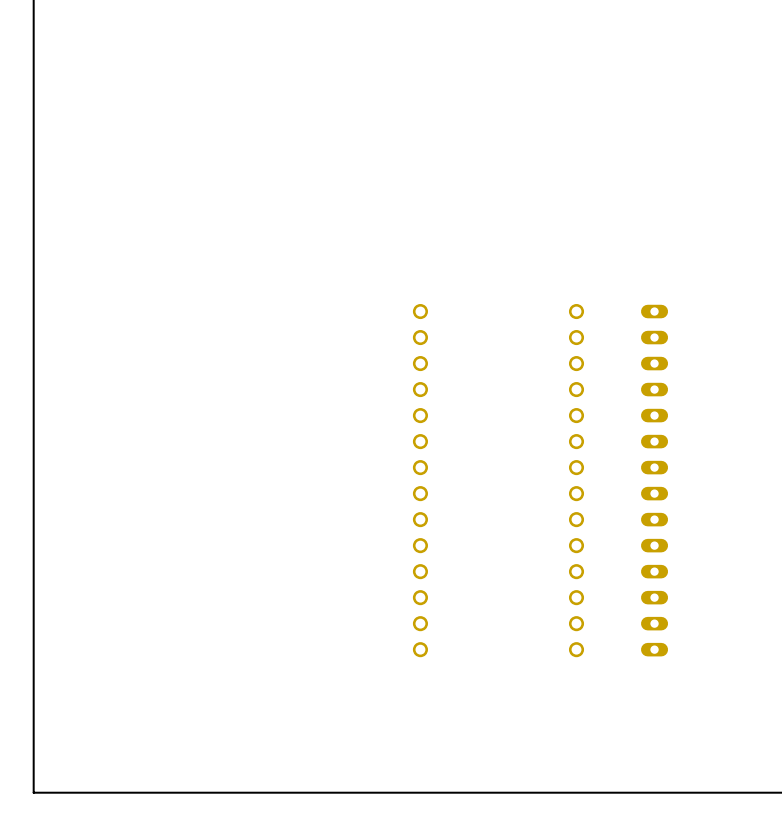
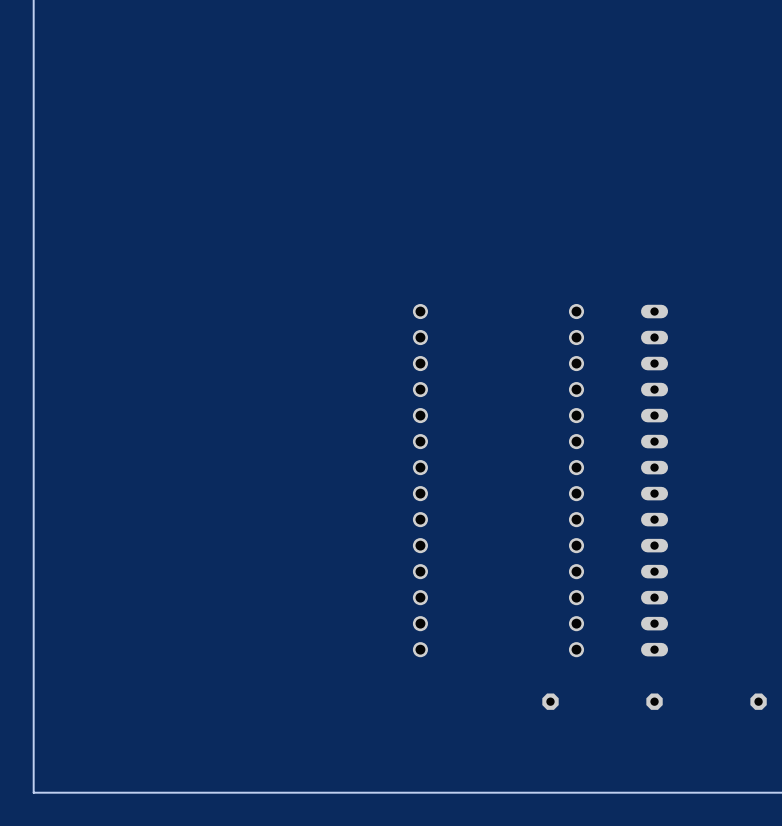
part: none -> (550, 701)
part: none -> (654, 701)
part: none -> (758, 701)

